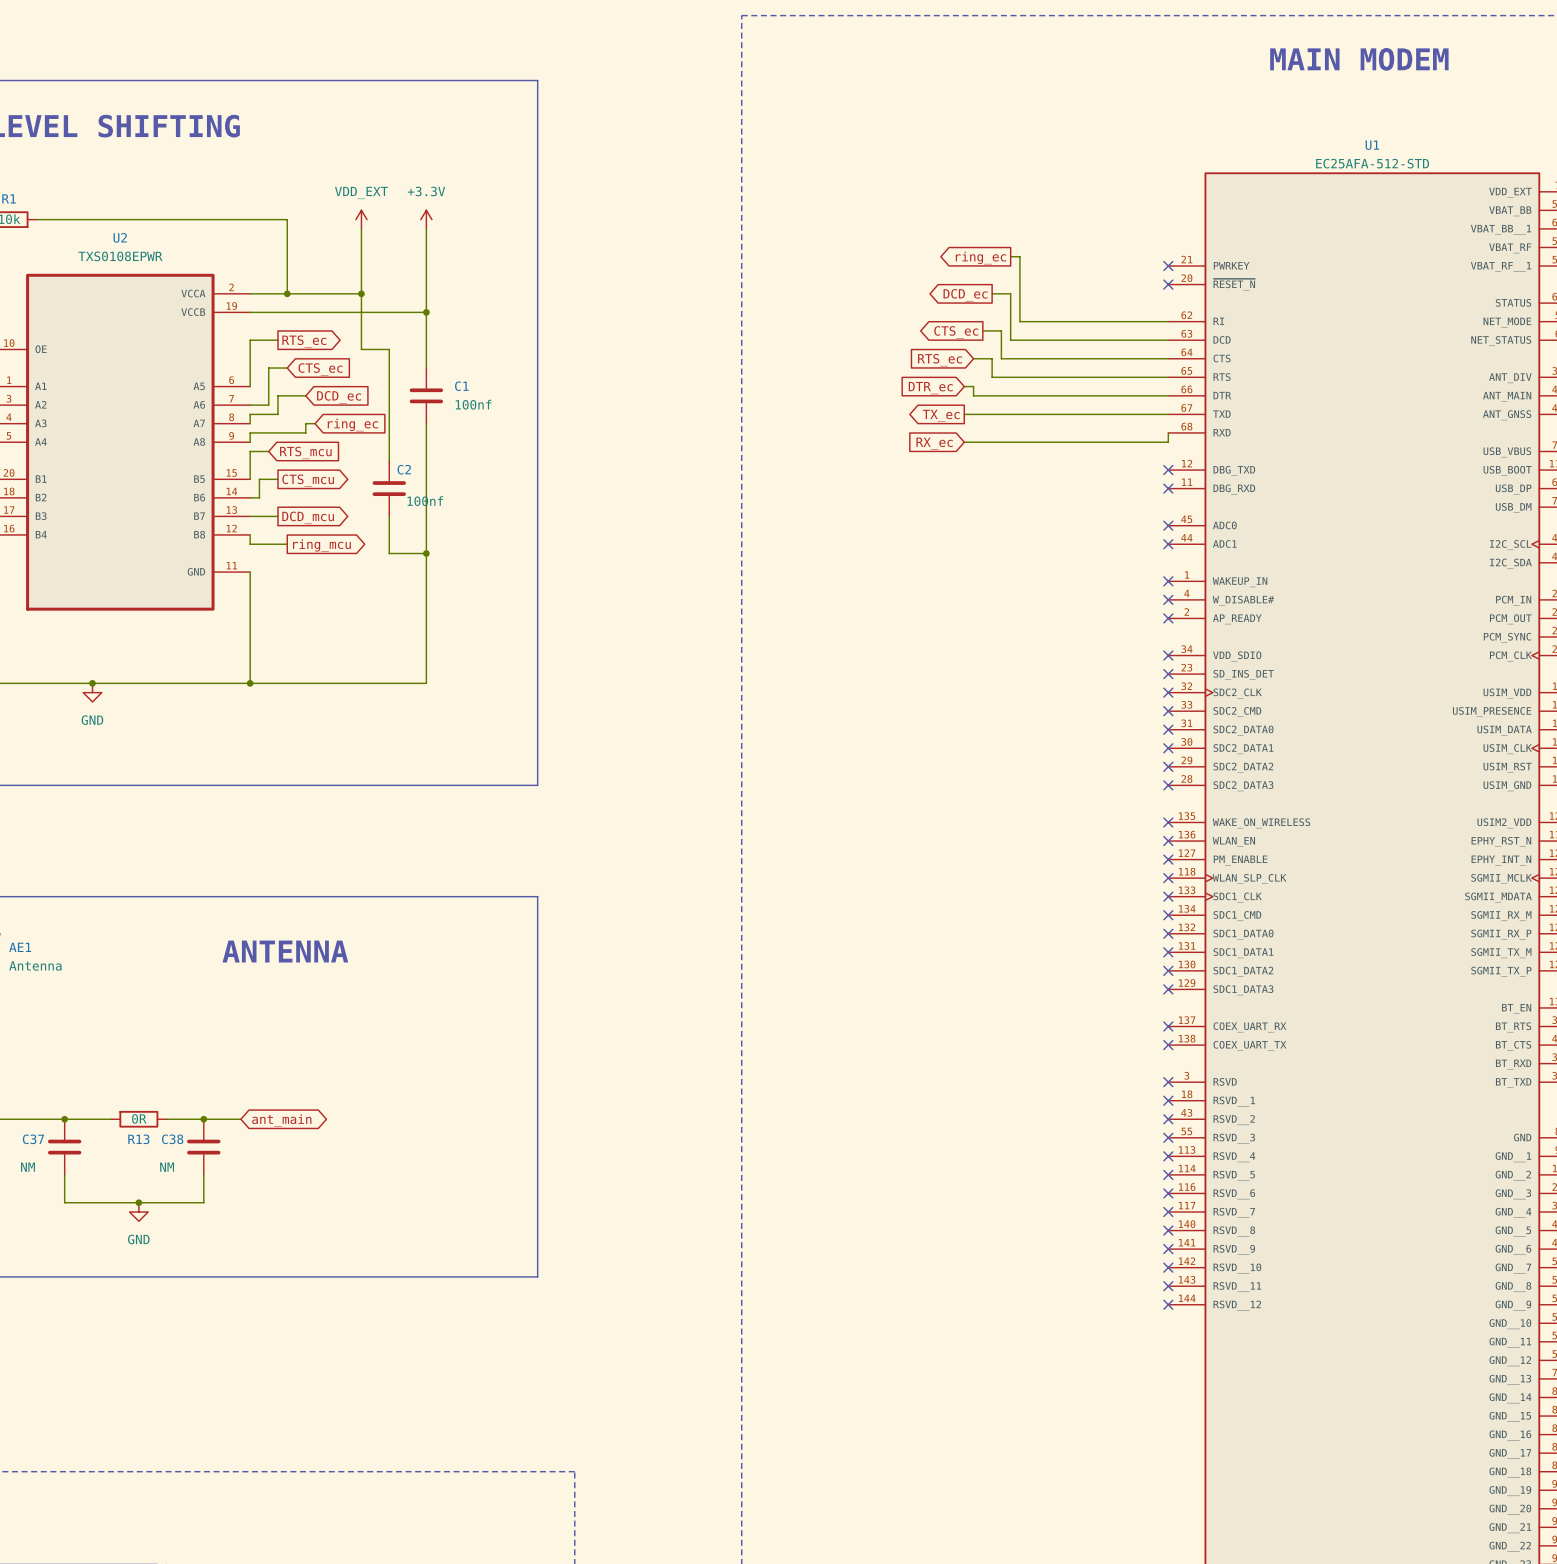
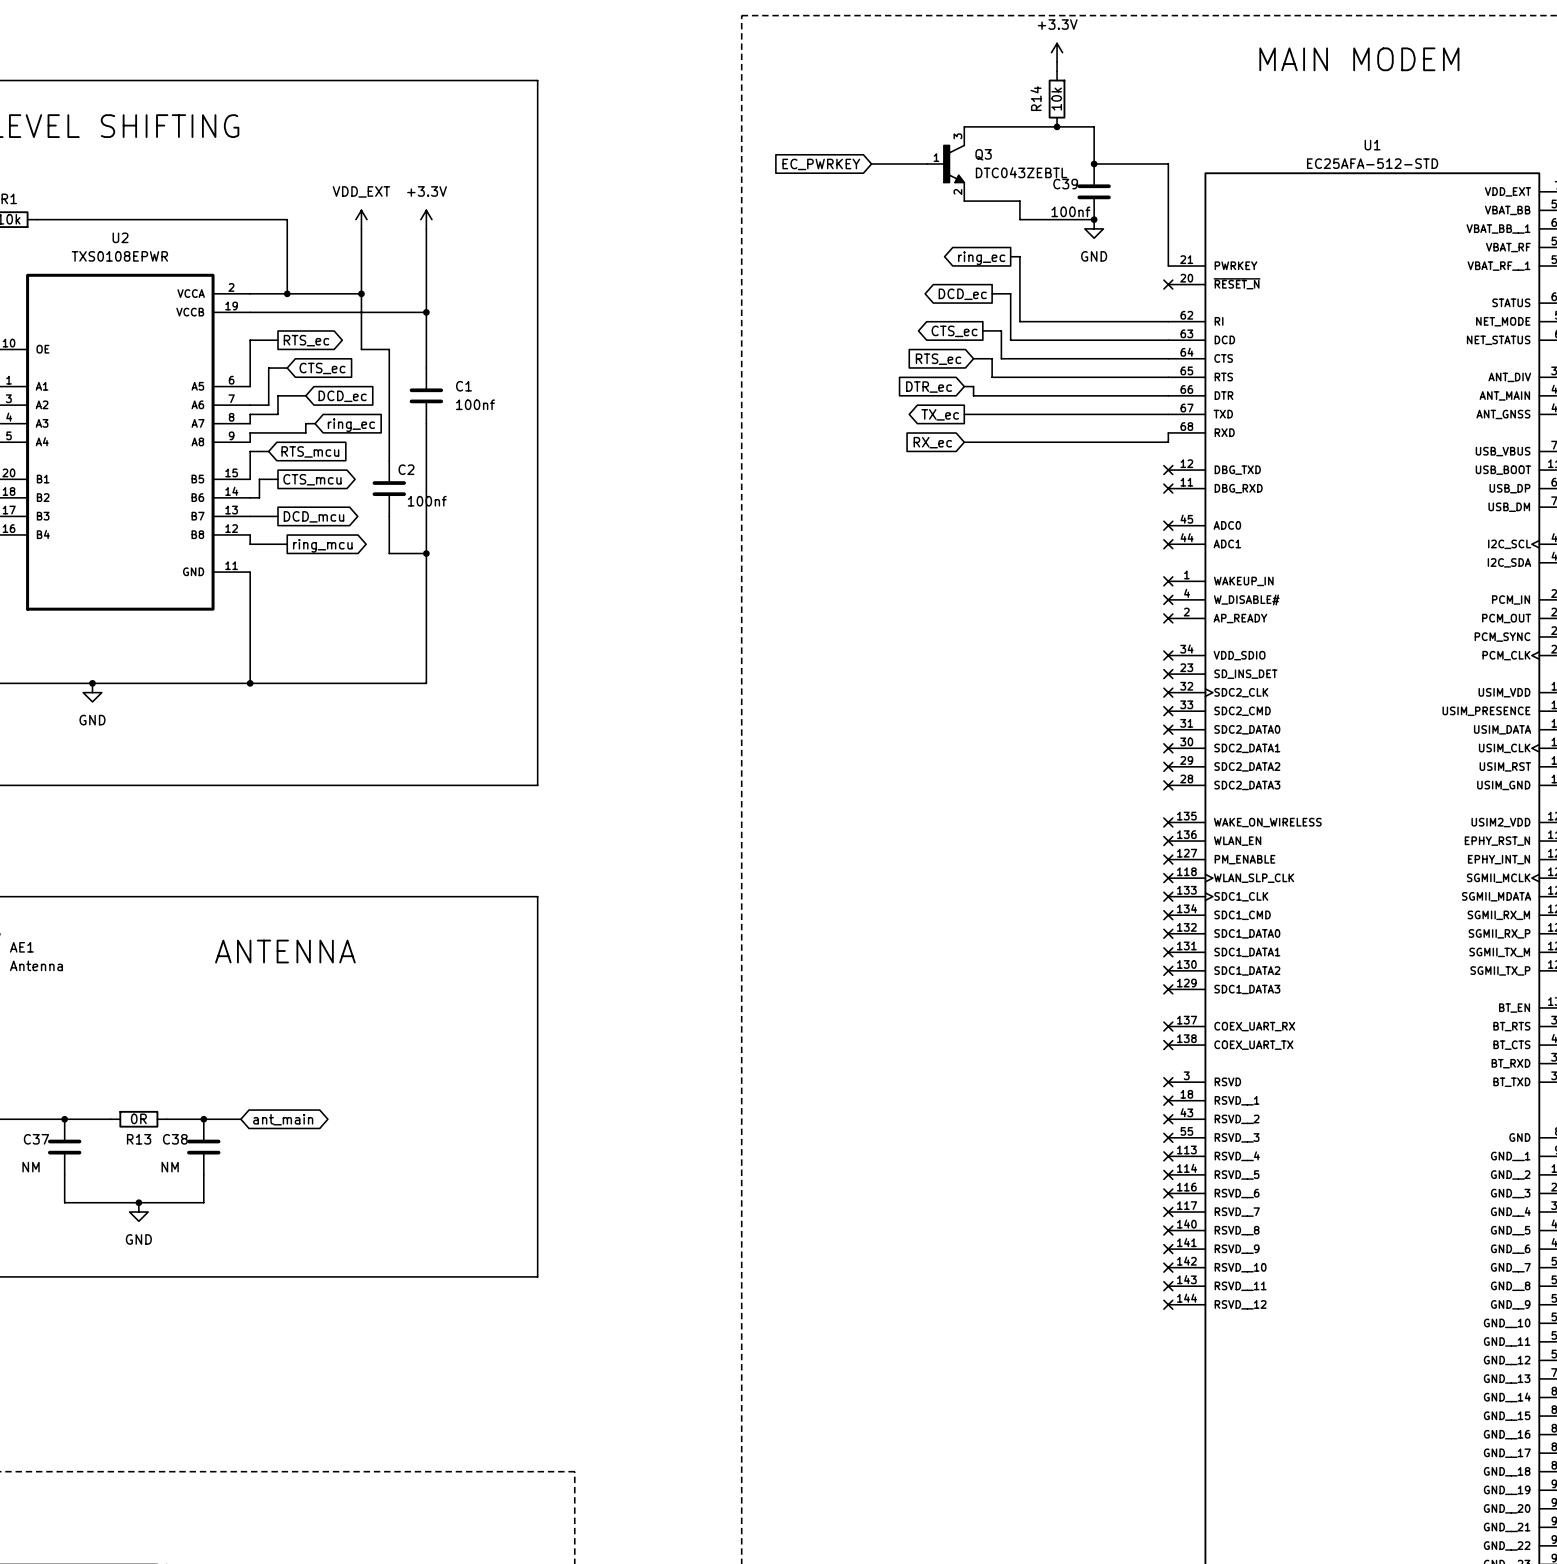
power symbol: none -> +3.3V (1057, 52)
wire: none -> (1057, 61) (1057, 71)
R14: none -> 10k (1057, 99)
wire: none -> (964, 126) (1094, 126) (1094, 163) (1168, 163) (1168, 266)
junction: none -> (1057, 126)
wire: none -> (871, 163) (927, 163)
Q3: none -> DTC043ZEBTL (946, 163)
junction: none -> (1094, 163)
global label: none -> EC_PWRKEY (821, 164)
C39: none -> 100nf (1094, 191)
wire: none -> (964, 201) (1019, 201) (1019, 219) (1094, 219)
junction: none -> (1094, 219)
power symbol: none -> GND (1094, 228)
no-connect mark: (1168, 266) -> none

